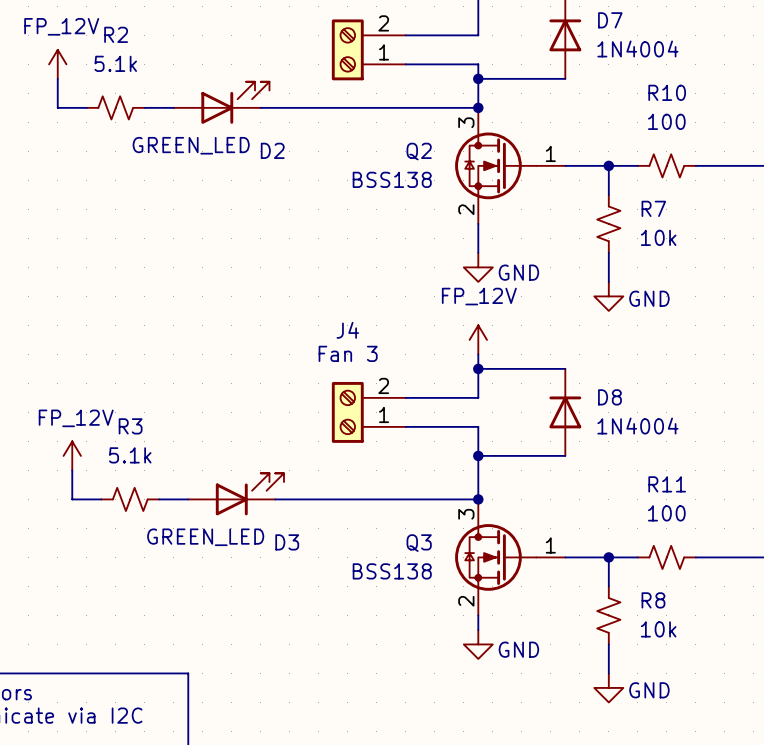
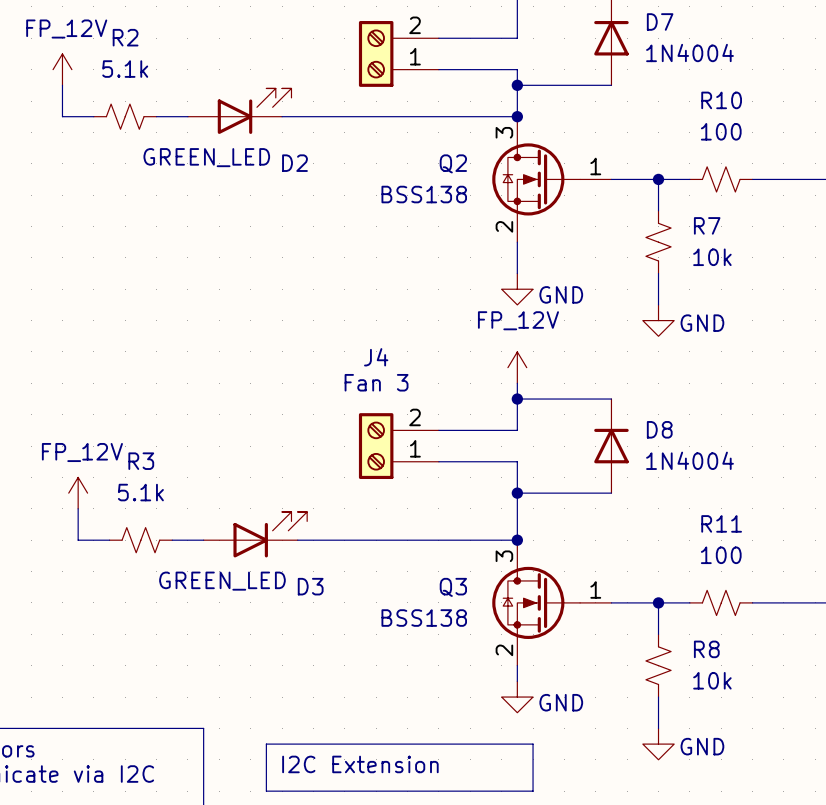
line: none -> (266, 744) (533, 744) (533, 791) (266, 791) (266, 744)
text: none -> I2C Extension (360, 764)

